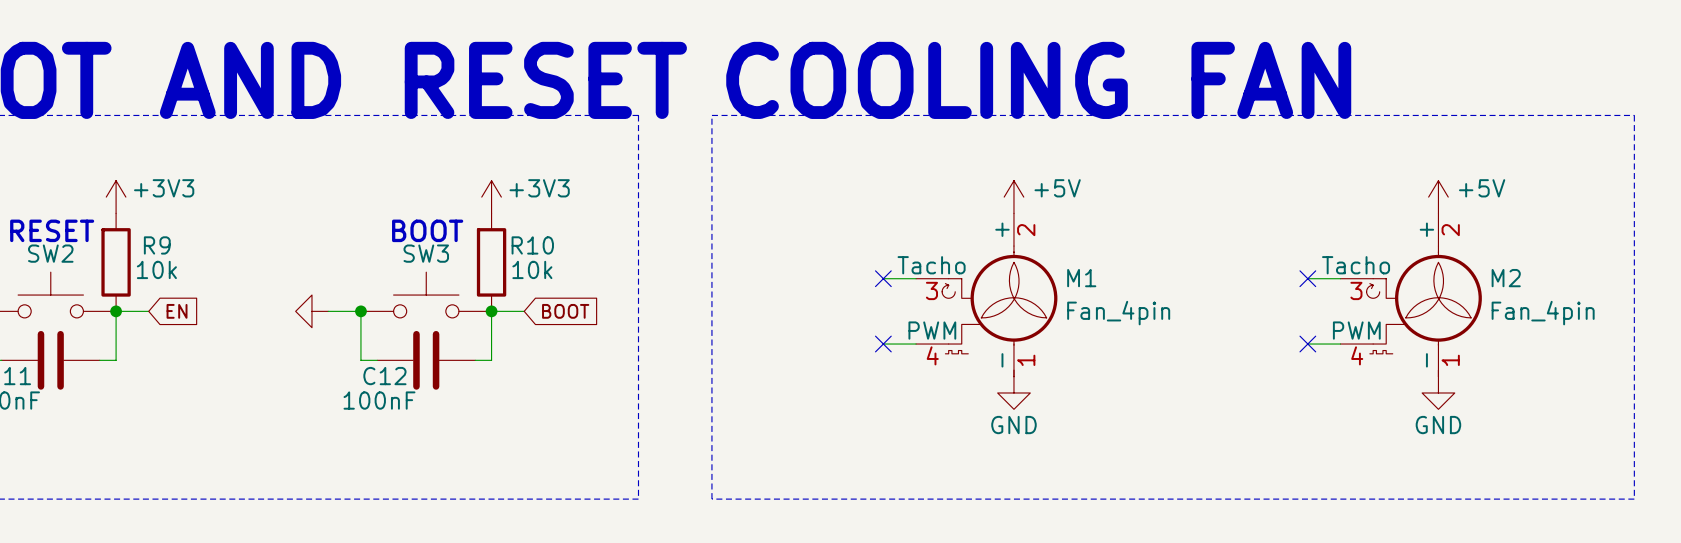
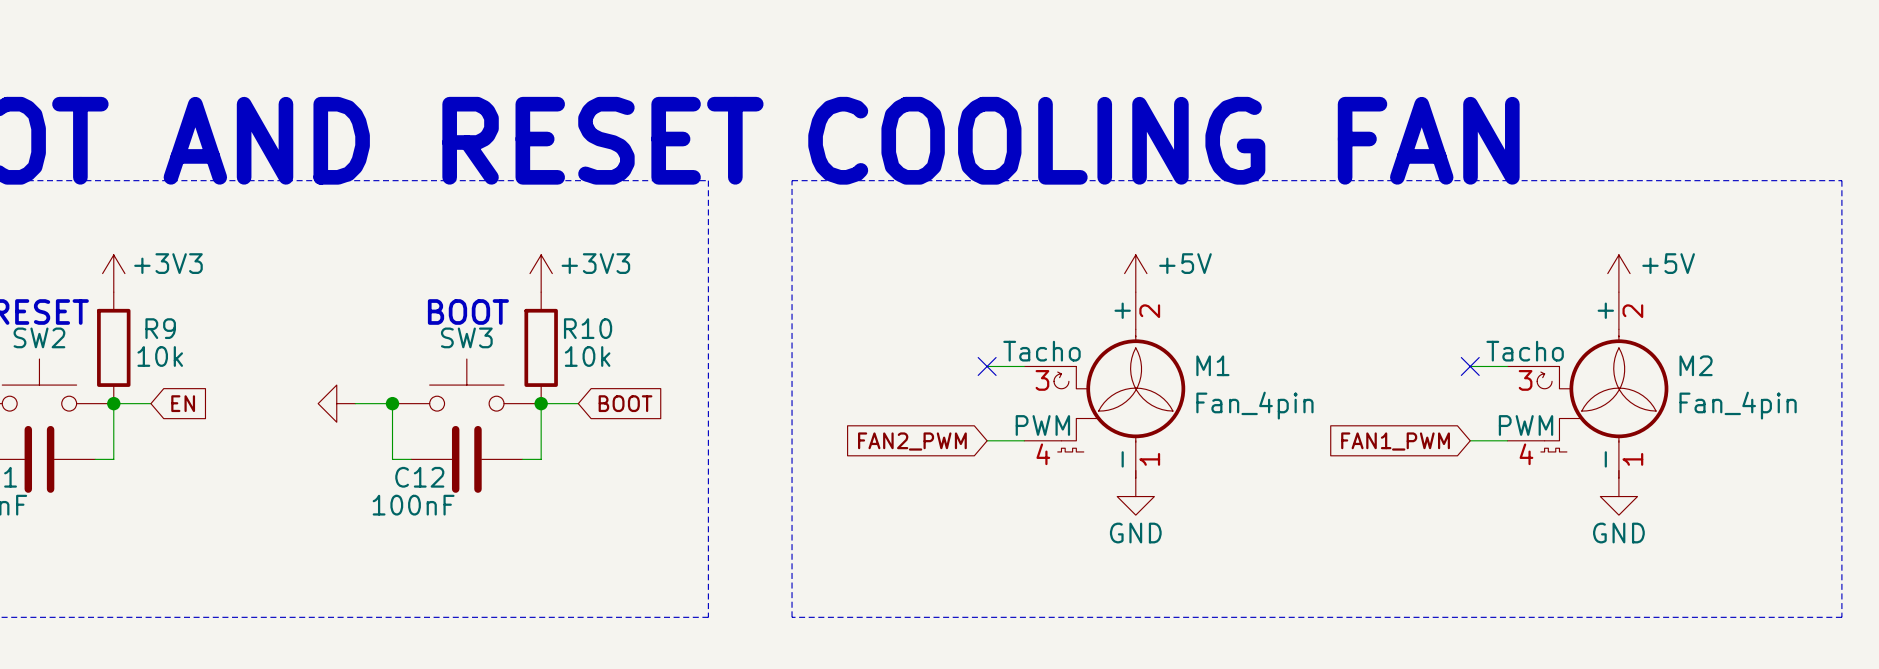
global label: none -> FAN2_PWM (912, 441)
no-connect mark: (883, 344) -> none
global label: none -> FAN1_PWM (1395, 441)
no-connect mark: (1307, 344) -> none

